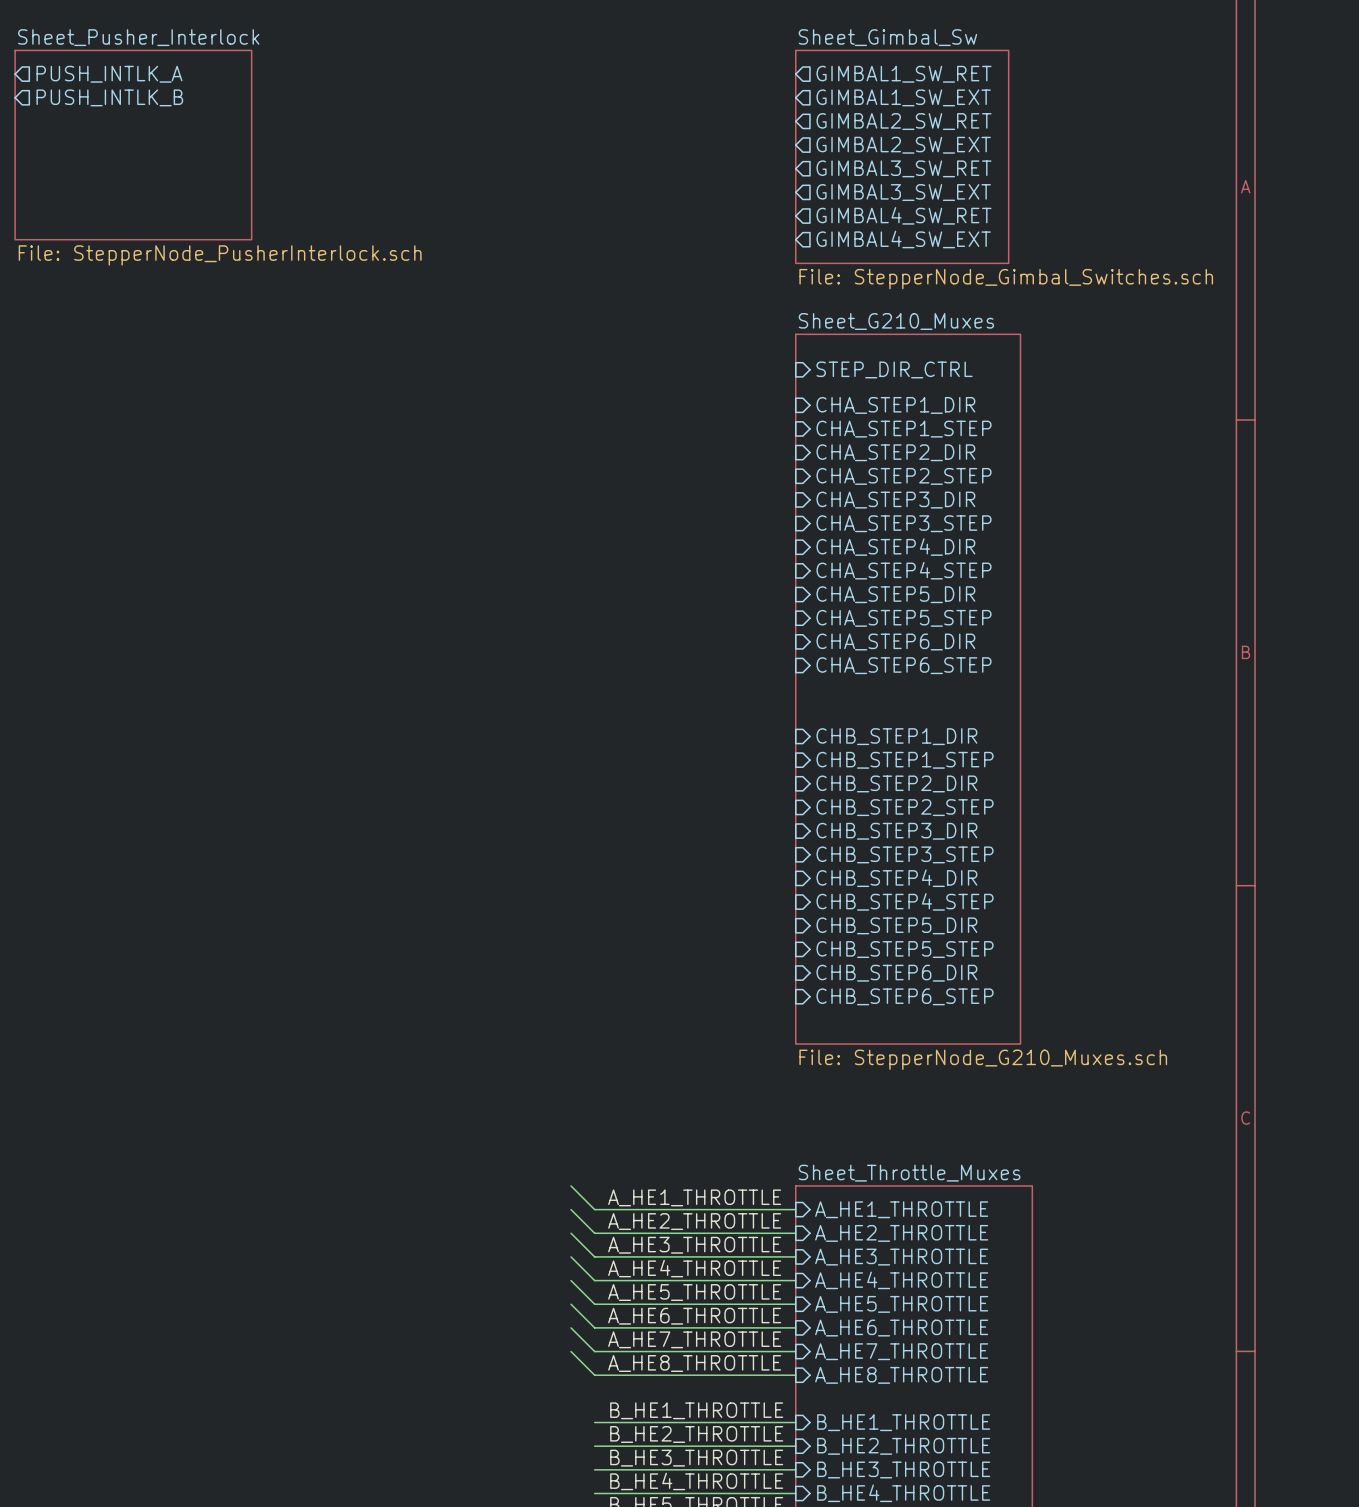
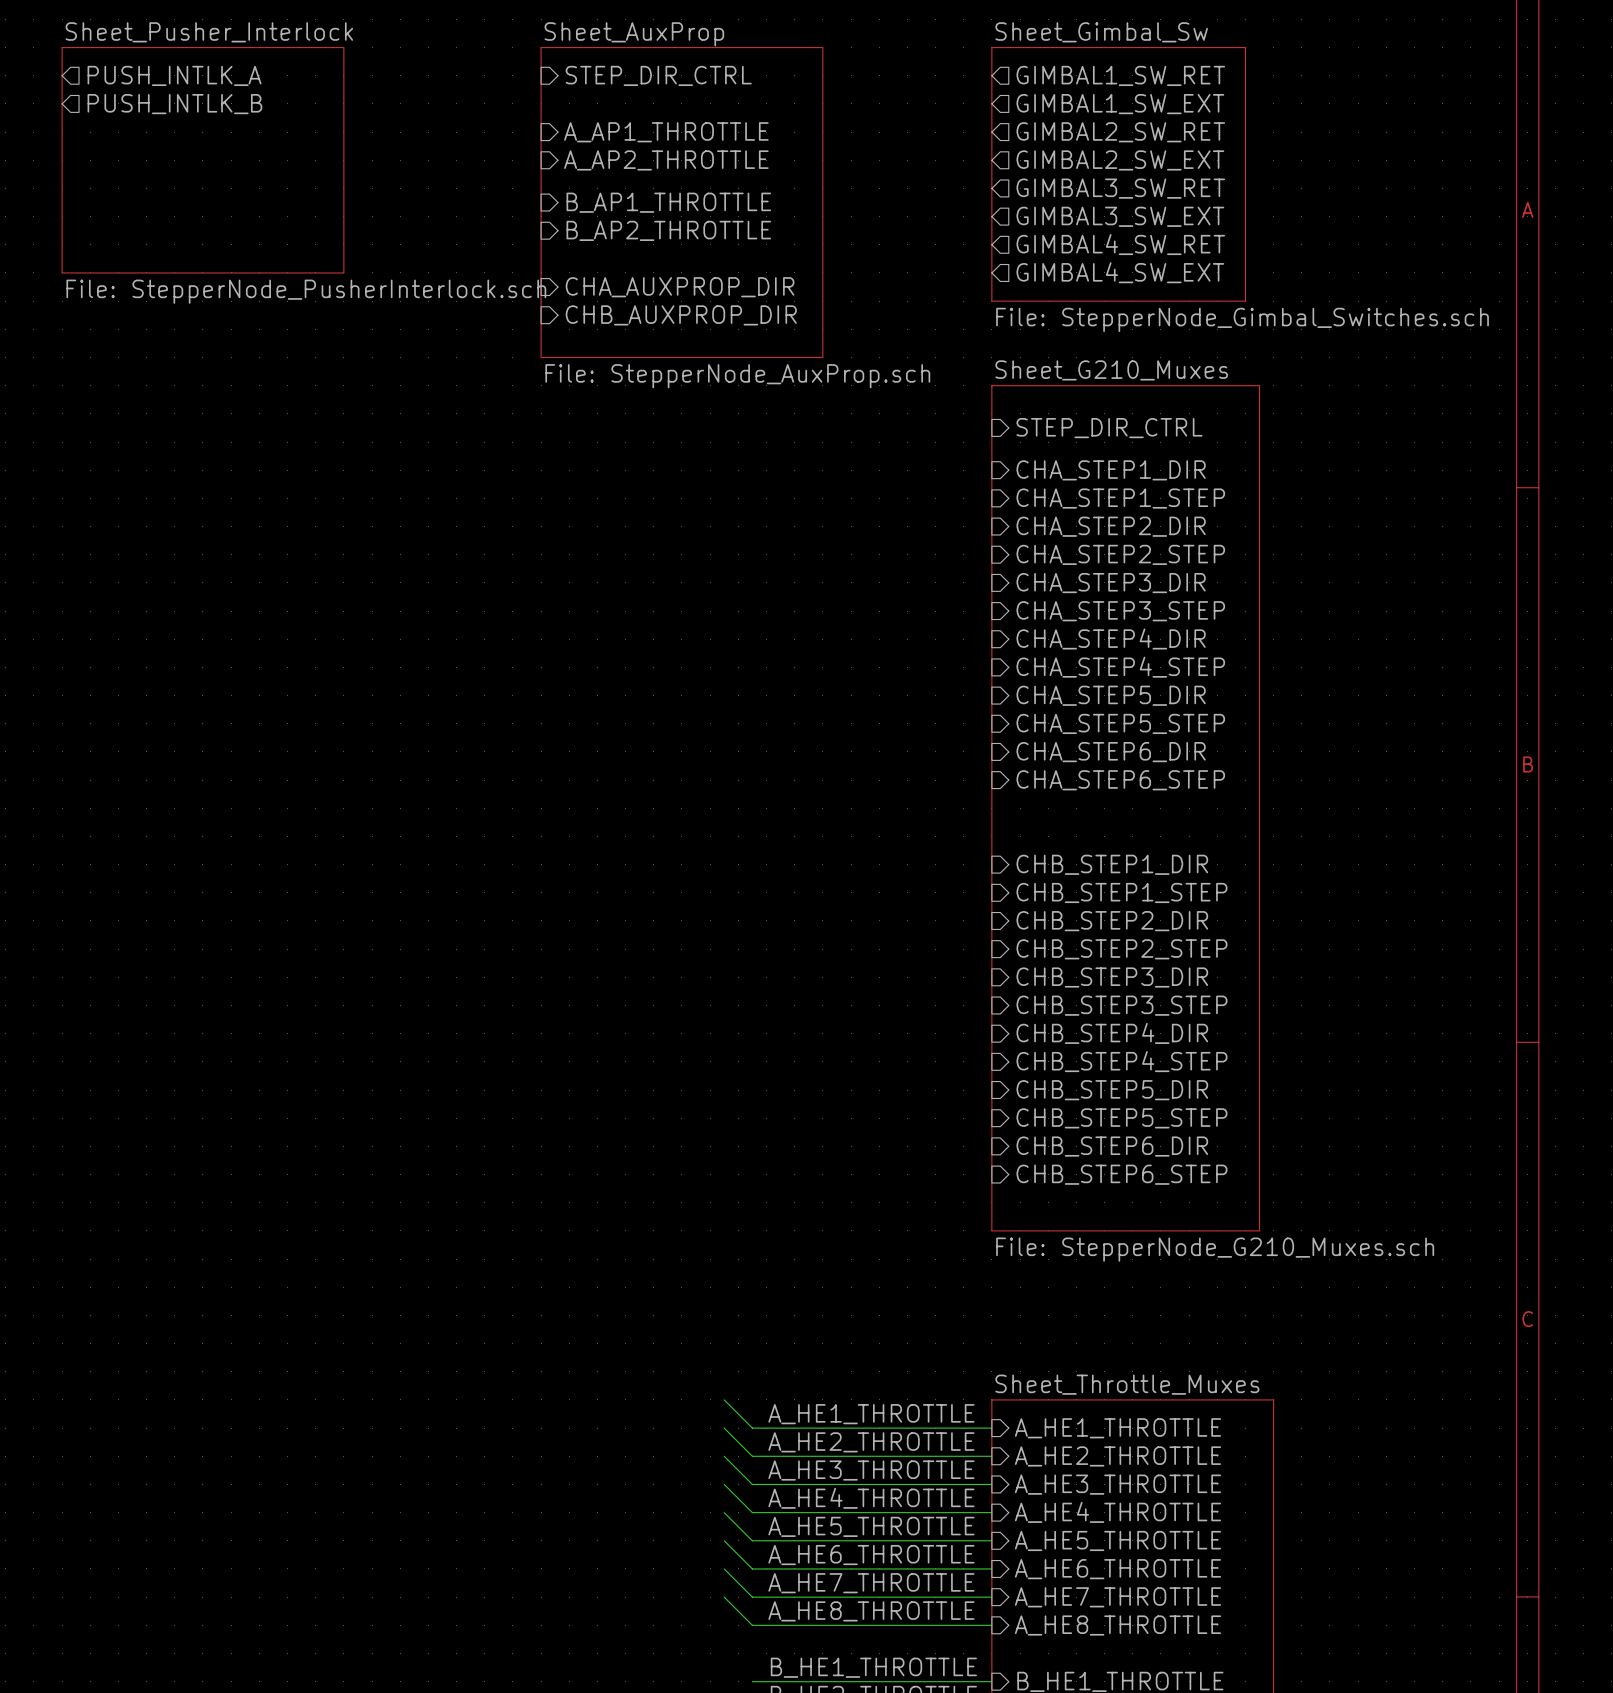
sheet pin: none -> STEP_DIR_CTRL (658, 75)
sheet pin: none -> A_AP1_THROTTLE (666, 132)
sheet pin: none -> A_AP2_THROTTLE (666, 160)
sheet pin: none -> B_AP1_THROTTLE (668, 202)
sheet Sheet_AuxProp: none -> File: StepperNode_AuxProp.sch (681, 202)
sheet pin: none -> B_AP2_THROTTLE (668, 230)
sheet pin: none -> CHA_AUXPROP_DIR (680, 287)
sheet pin: none -> CHB_AUXPROP_DIR (681, 315)

